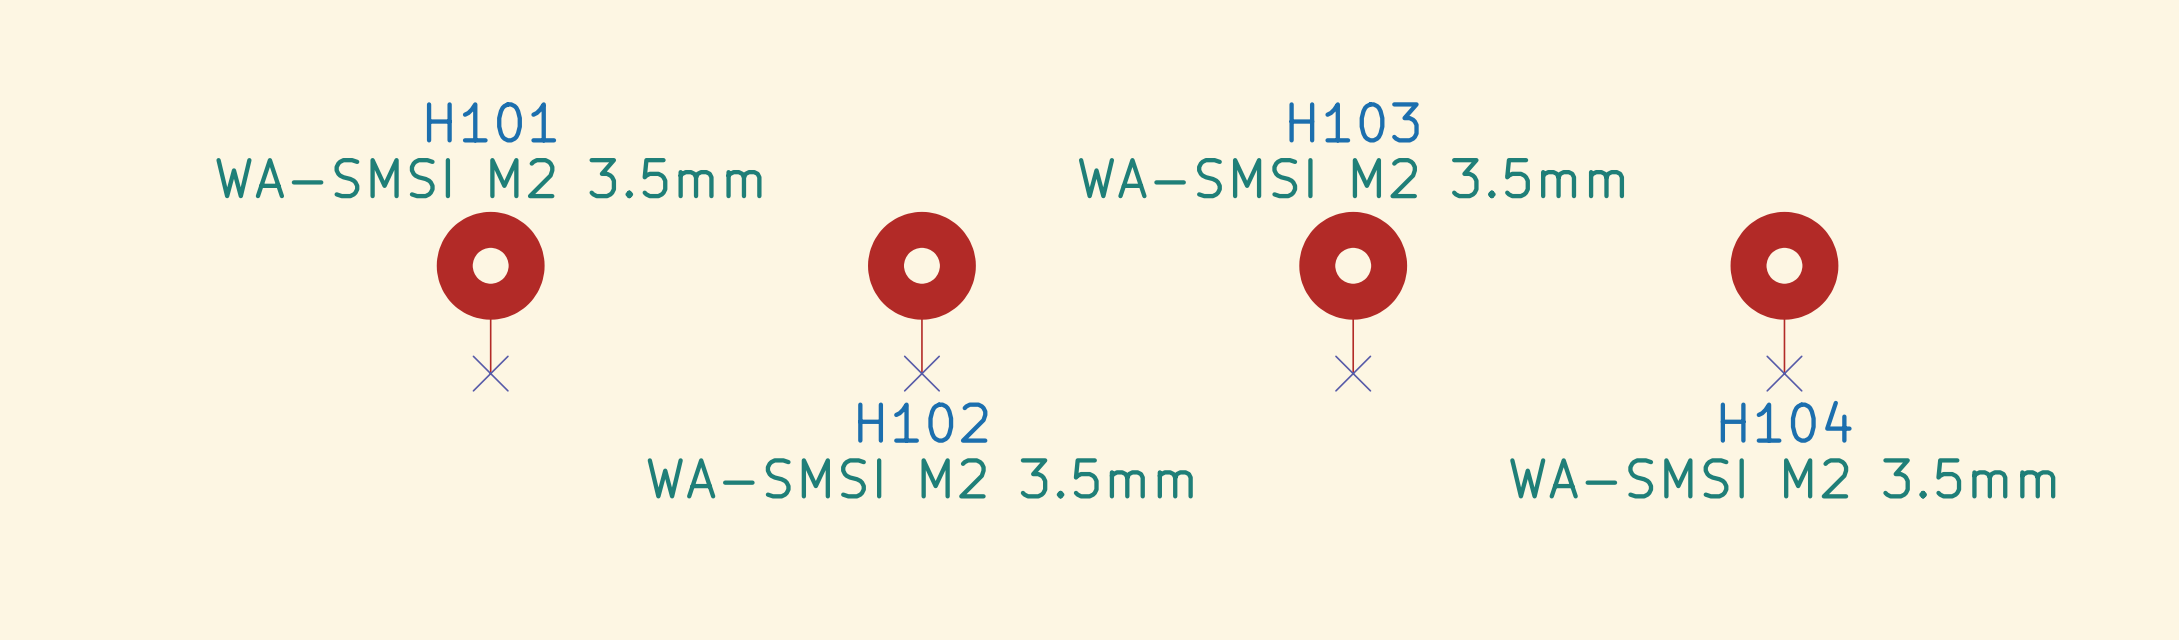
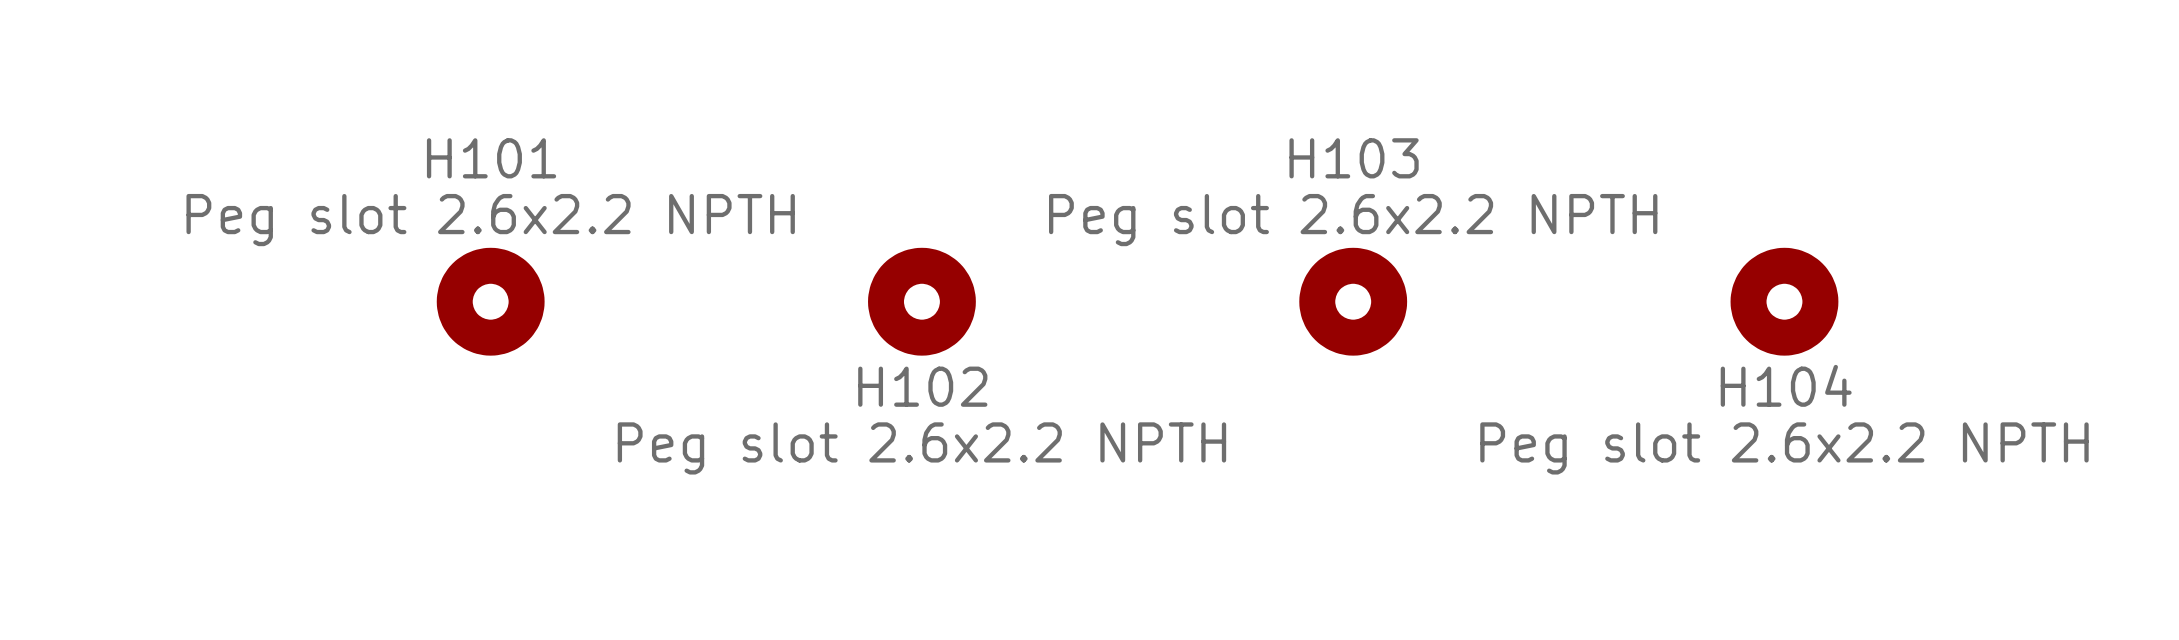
H101 value: WA-SMSI M2 3.5mm (488, 178) -> Peg slot 2.6x2.2 NPTH (490, 220)
H103 value: WA-SMSI M2 3.5mm (1351, 178) -> Peg slot 2.6x2.2 NPTH (1353, 220)
H101 symbol: [436, 211, 545, 374] -> [436, 247, 545, 356]
H102 symbol: [868, 211, 976, 374] -> [868, 247, 976, 356]
H103 symbol: [1299, 211, 1408, 374] -> [1299, 247, 1408, 356]
H104 symbol: [1730, 211, 1839, 374] -> [1730, 247, 1839, 356]
no-connect mark: (490, 373) -> none
no-connect mark: (921, 373) -> none
no-connect mark: (1353, 373) -> none
no-connect mark: (1784, 373) -> none
H102 value: WA-SMSI M2 3.5mm (920, 478) -> Peg slot 2.6x2.2 NPTH (921, 448)
H104 value: WA-SMSI M2 3.5mm (1782, 478) -> Peg slot 2.6x2.2 NPTH (1784, 448)

